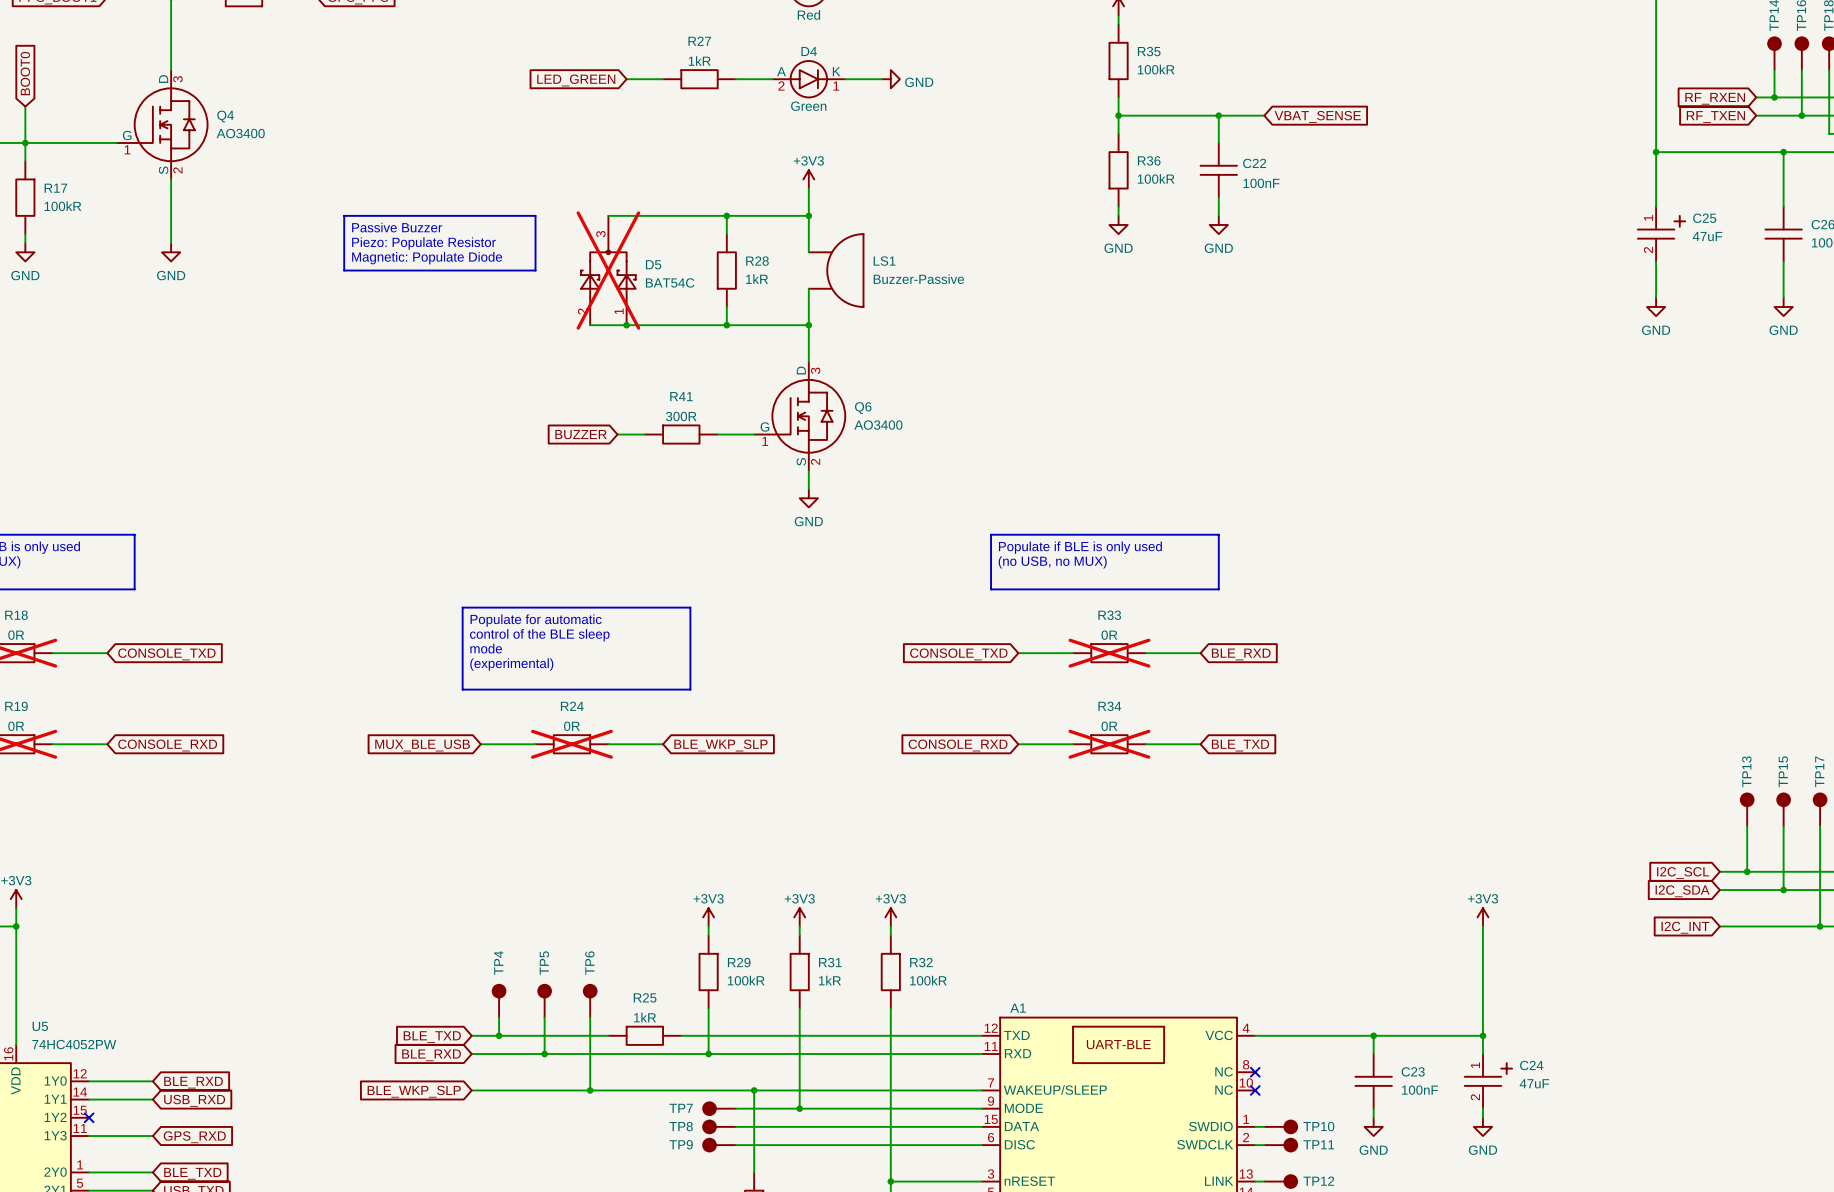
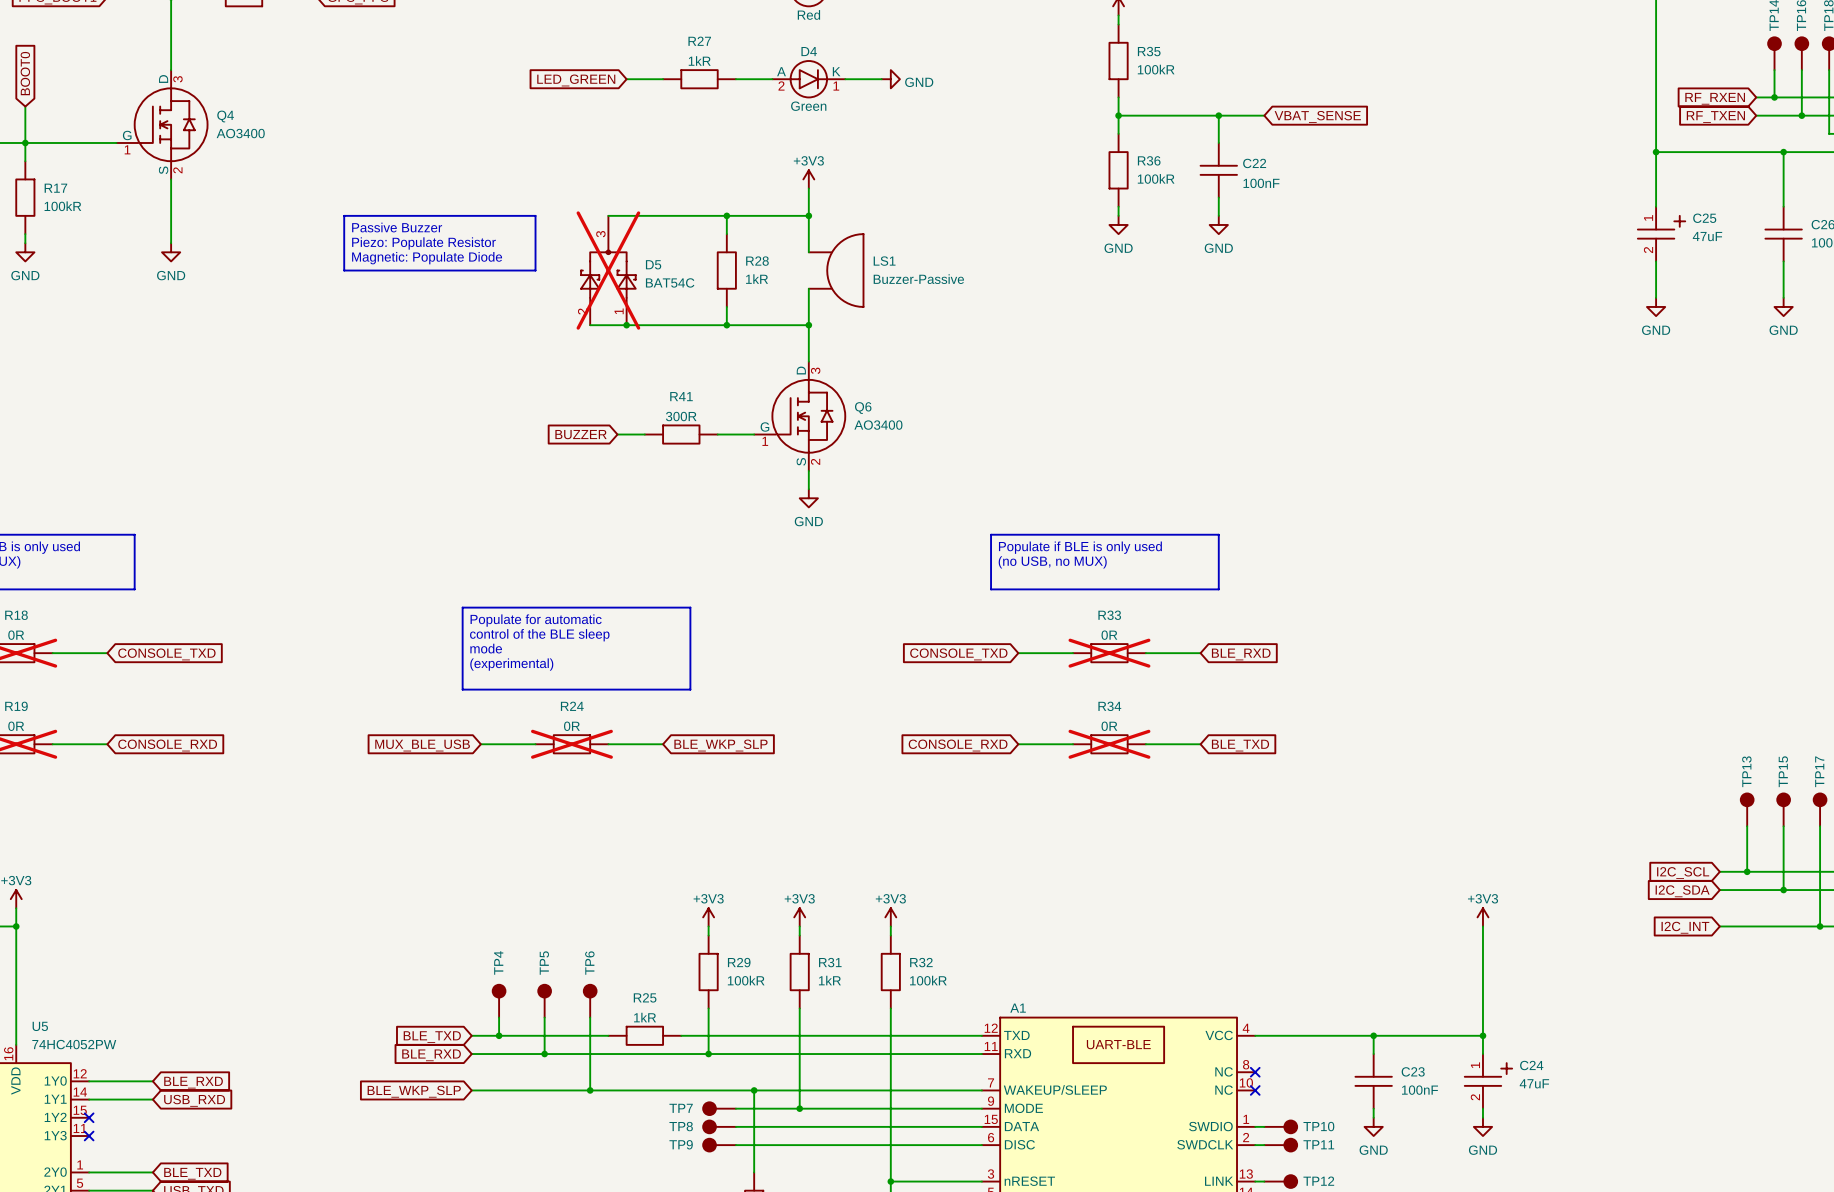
wire: (89, 1136) (152, 1136) -> none
no-connect mark: none -> (89, 1136)
global label: GPS_RXD (194, 1137) -> none

